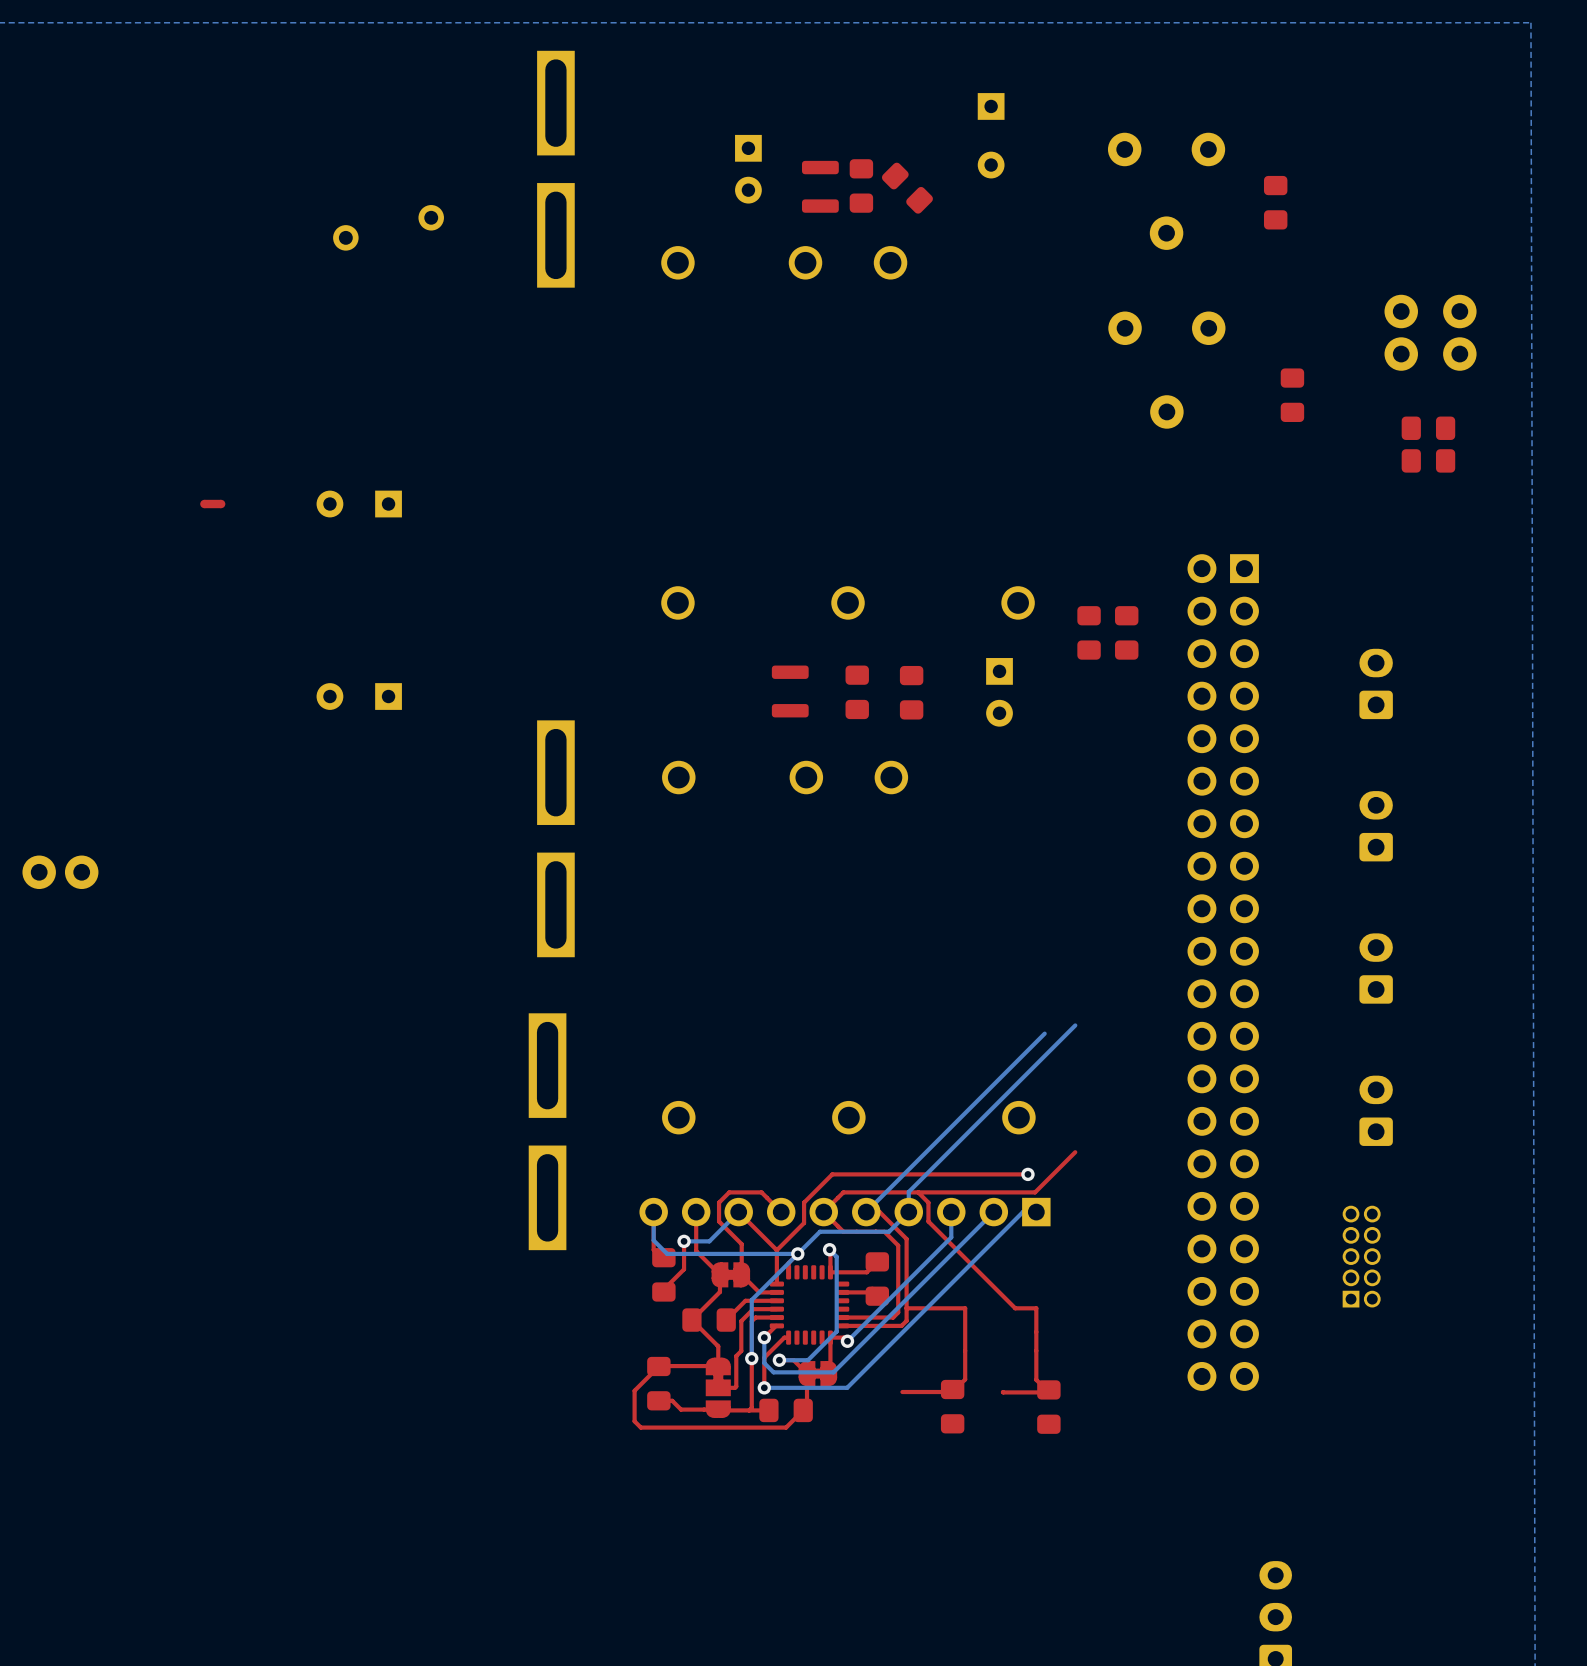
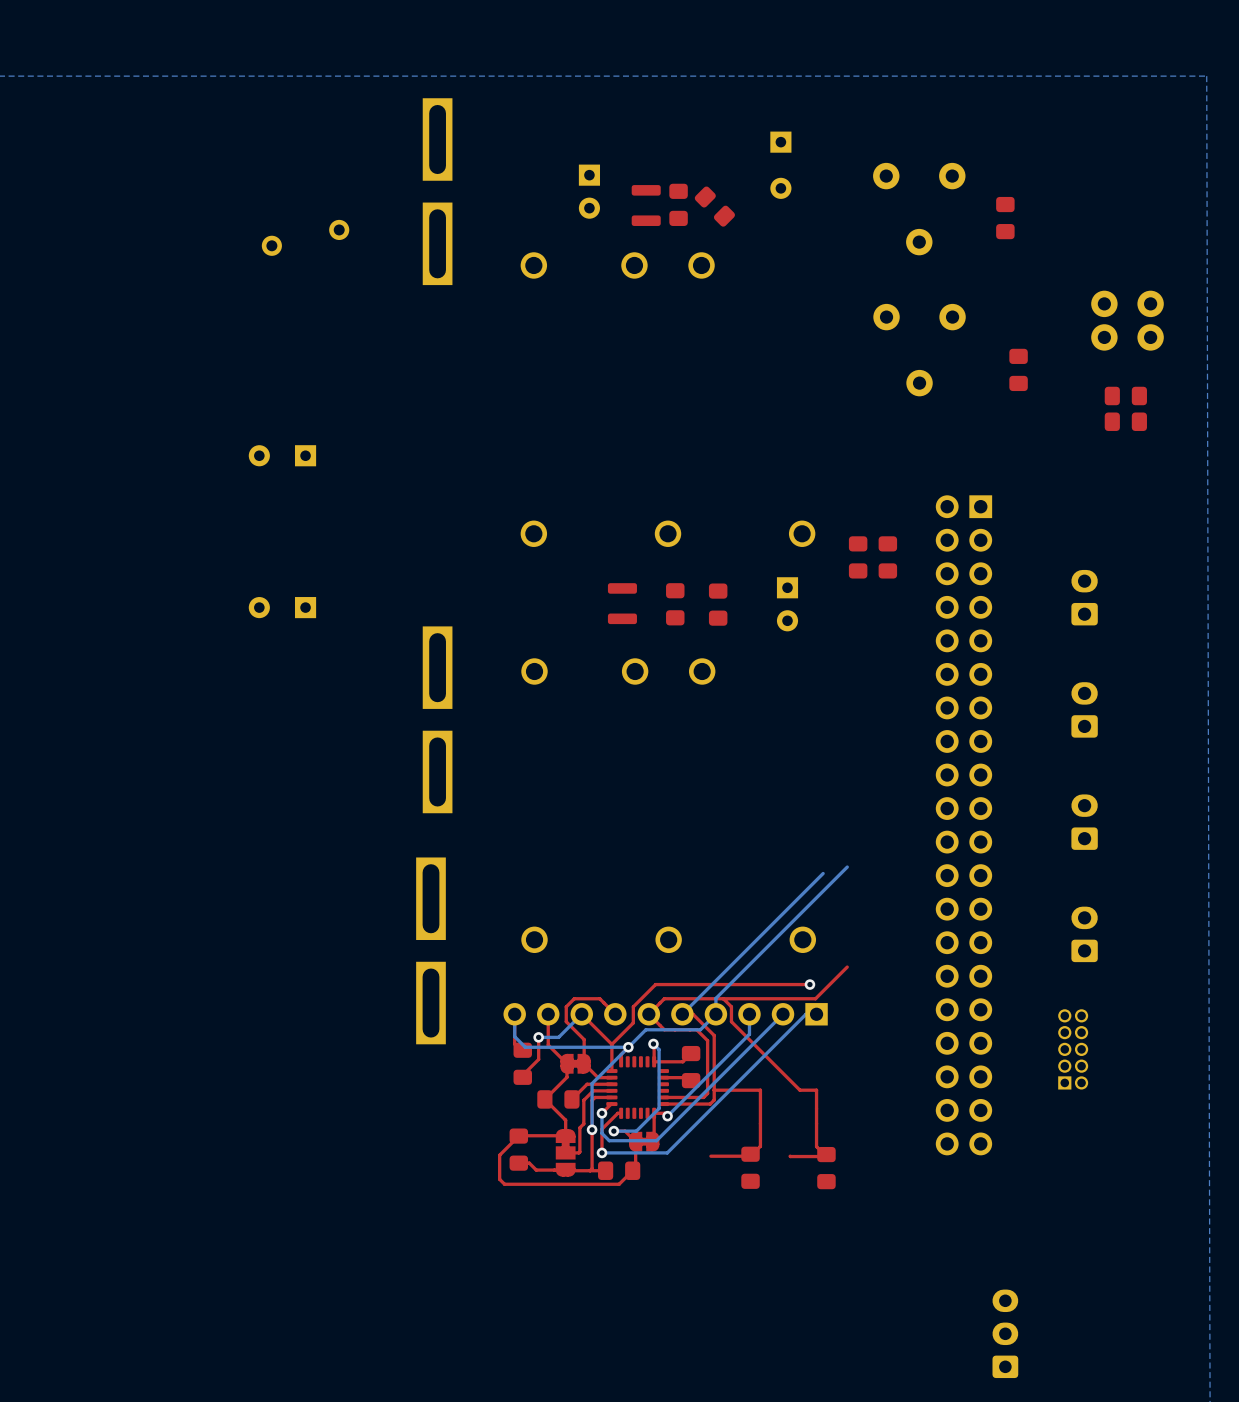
part: (212, 504) -> none
part: (60, 872) -> none

